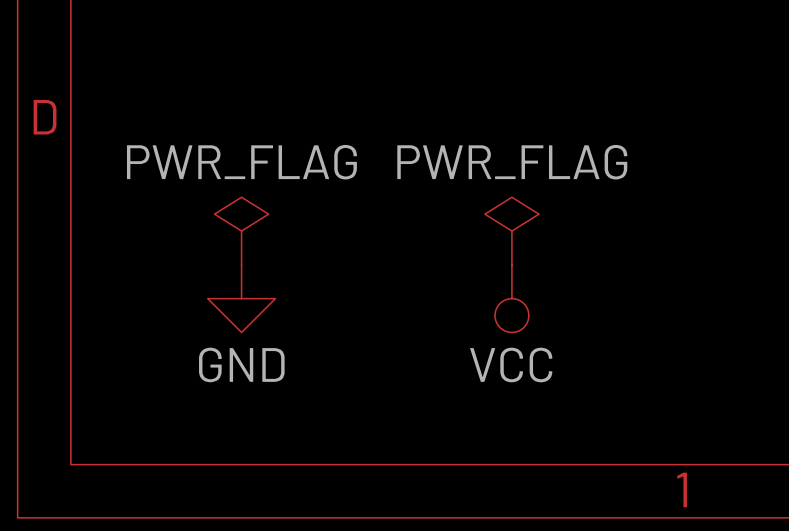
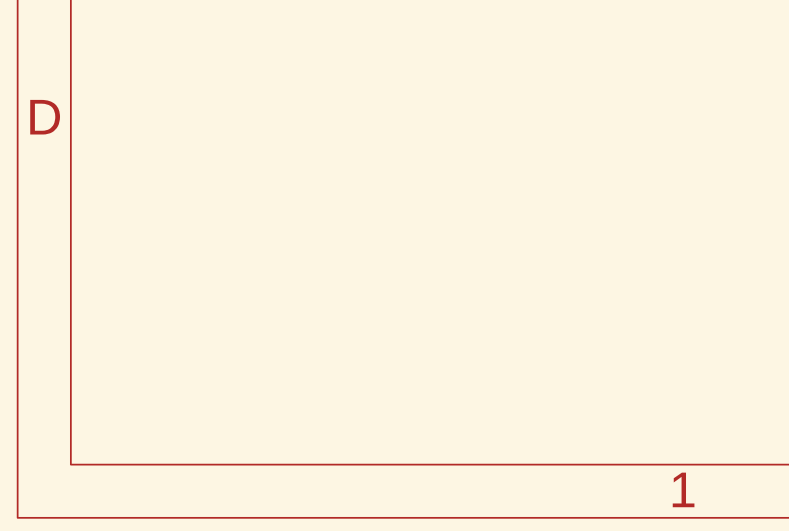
power symbol: PWR_FLAG (241, 231) -> none
power symbol: PWR_FLAG (511, 231) -> none
power symbol: GND (241, 298) -> none
power symbol: VCC (511, 298) -> none

